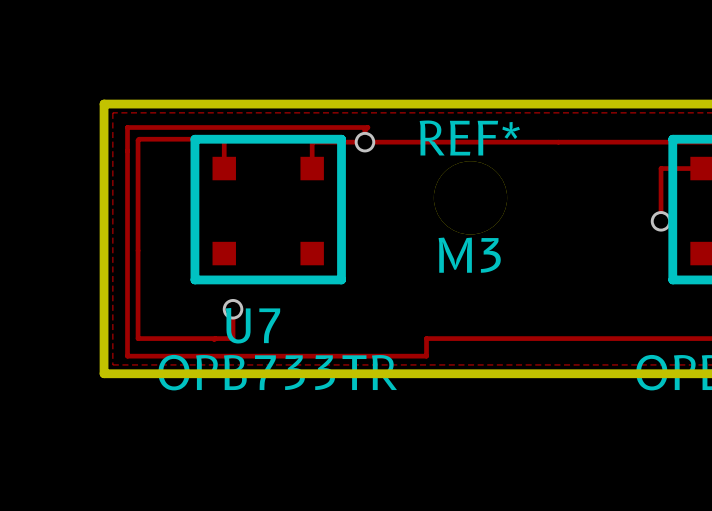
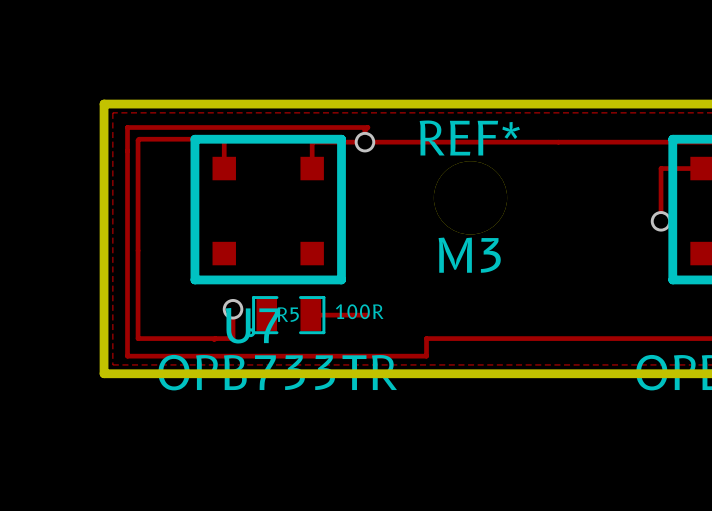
track: none -> (310, 315) (367, 315)
R5: none -> 100R (285, 316)

